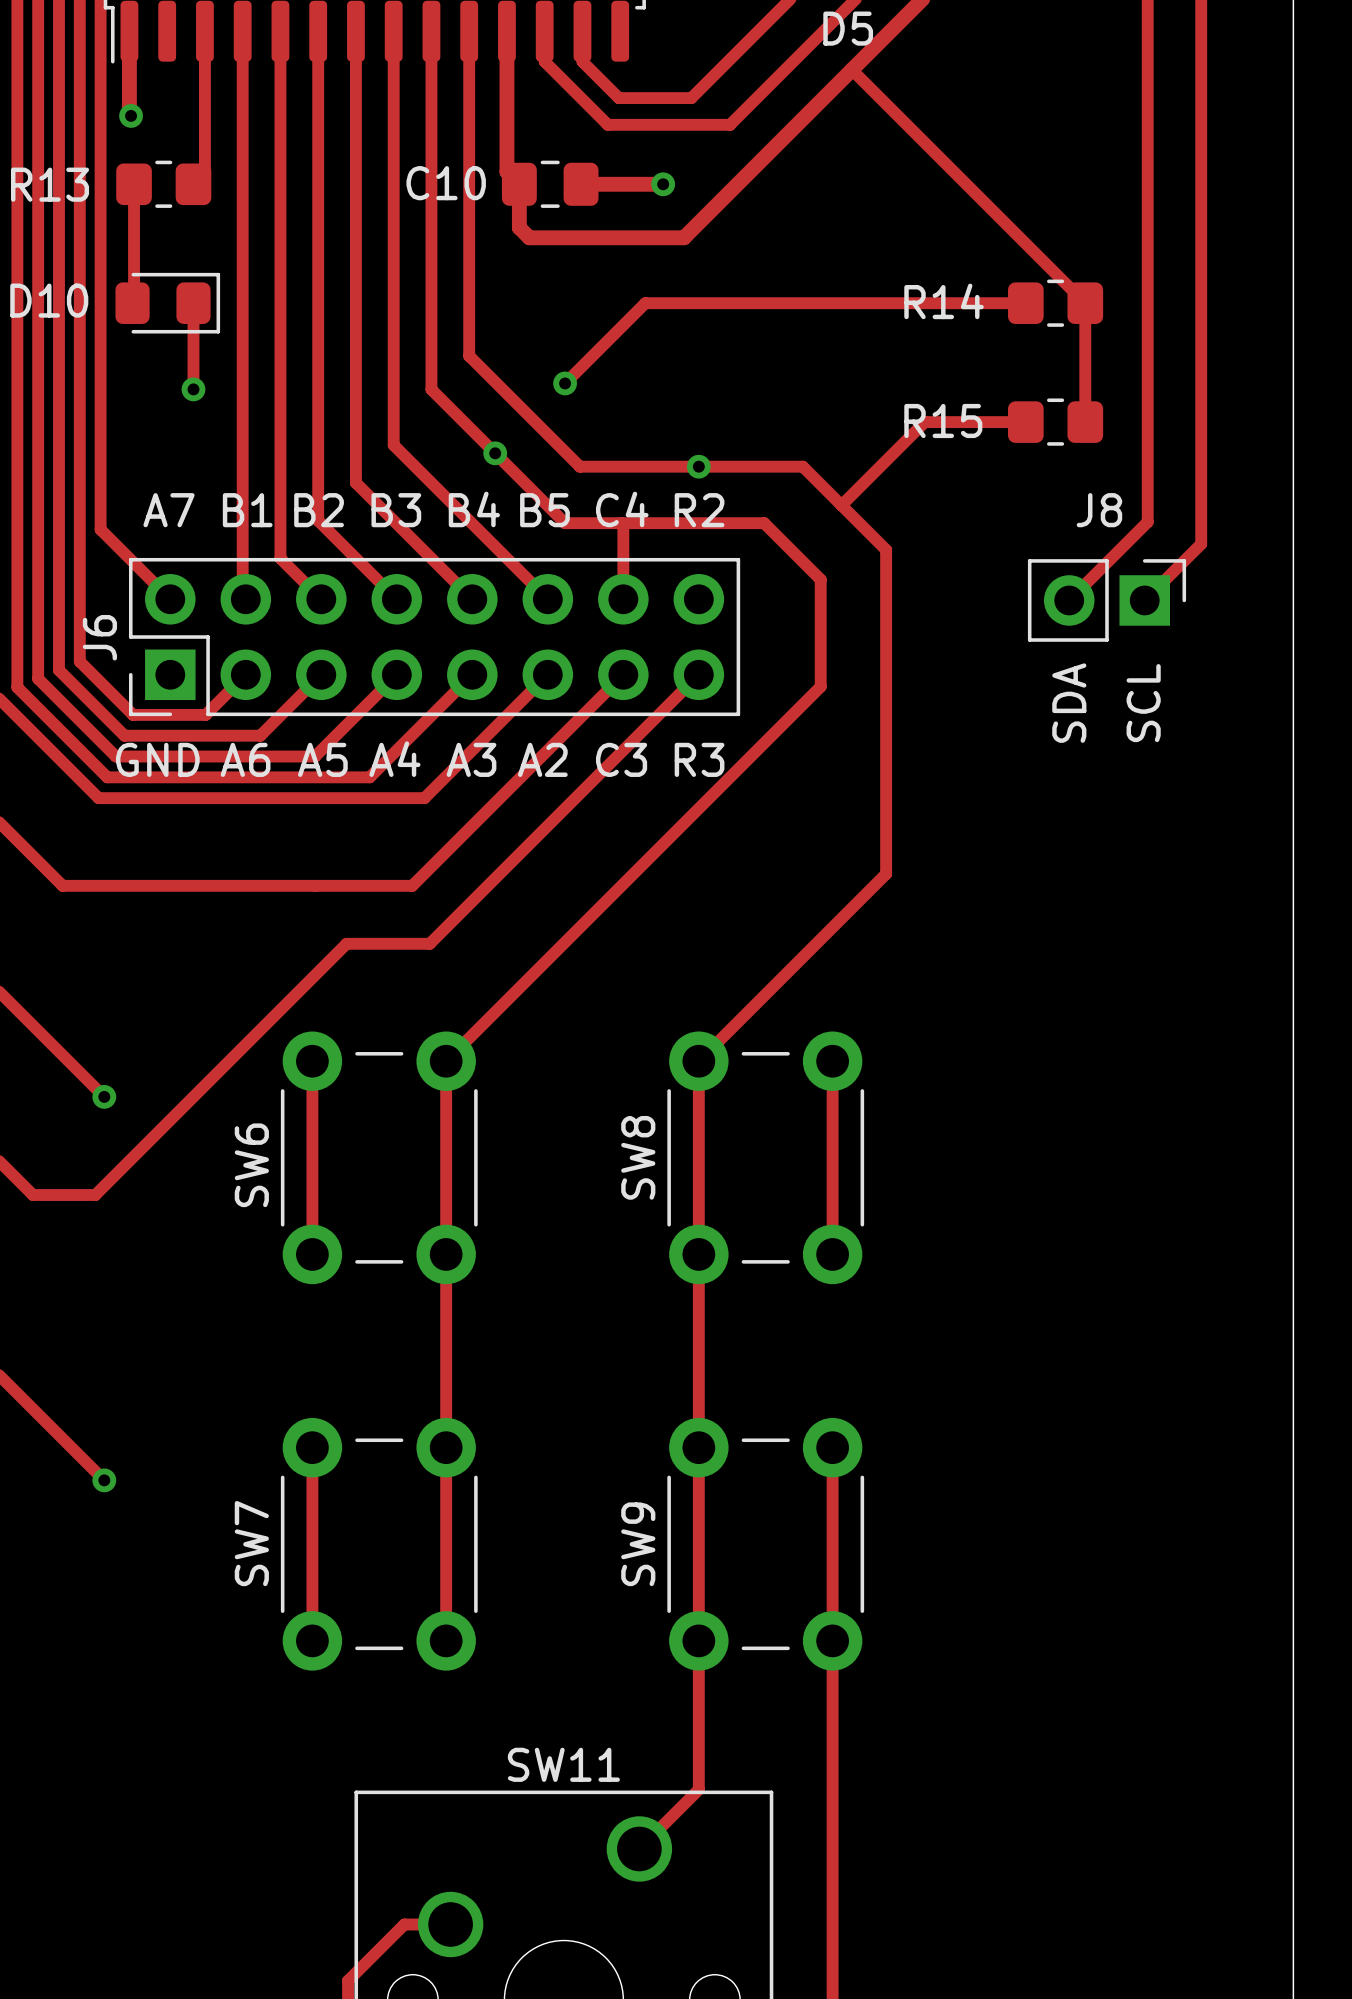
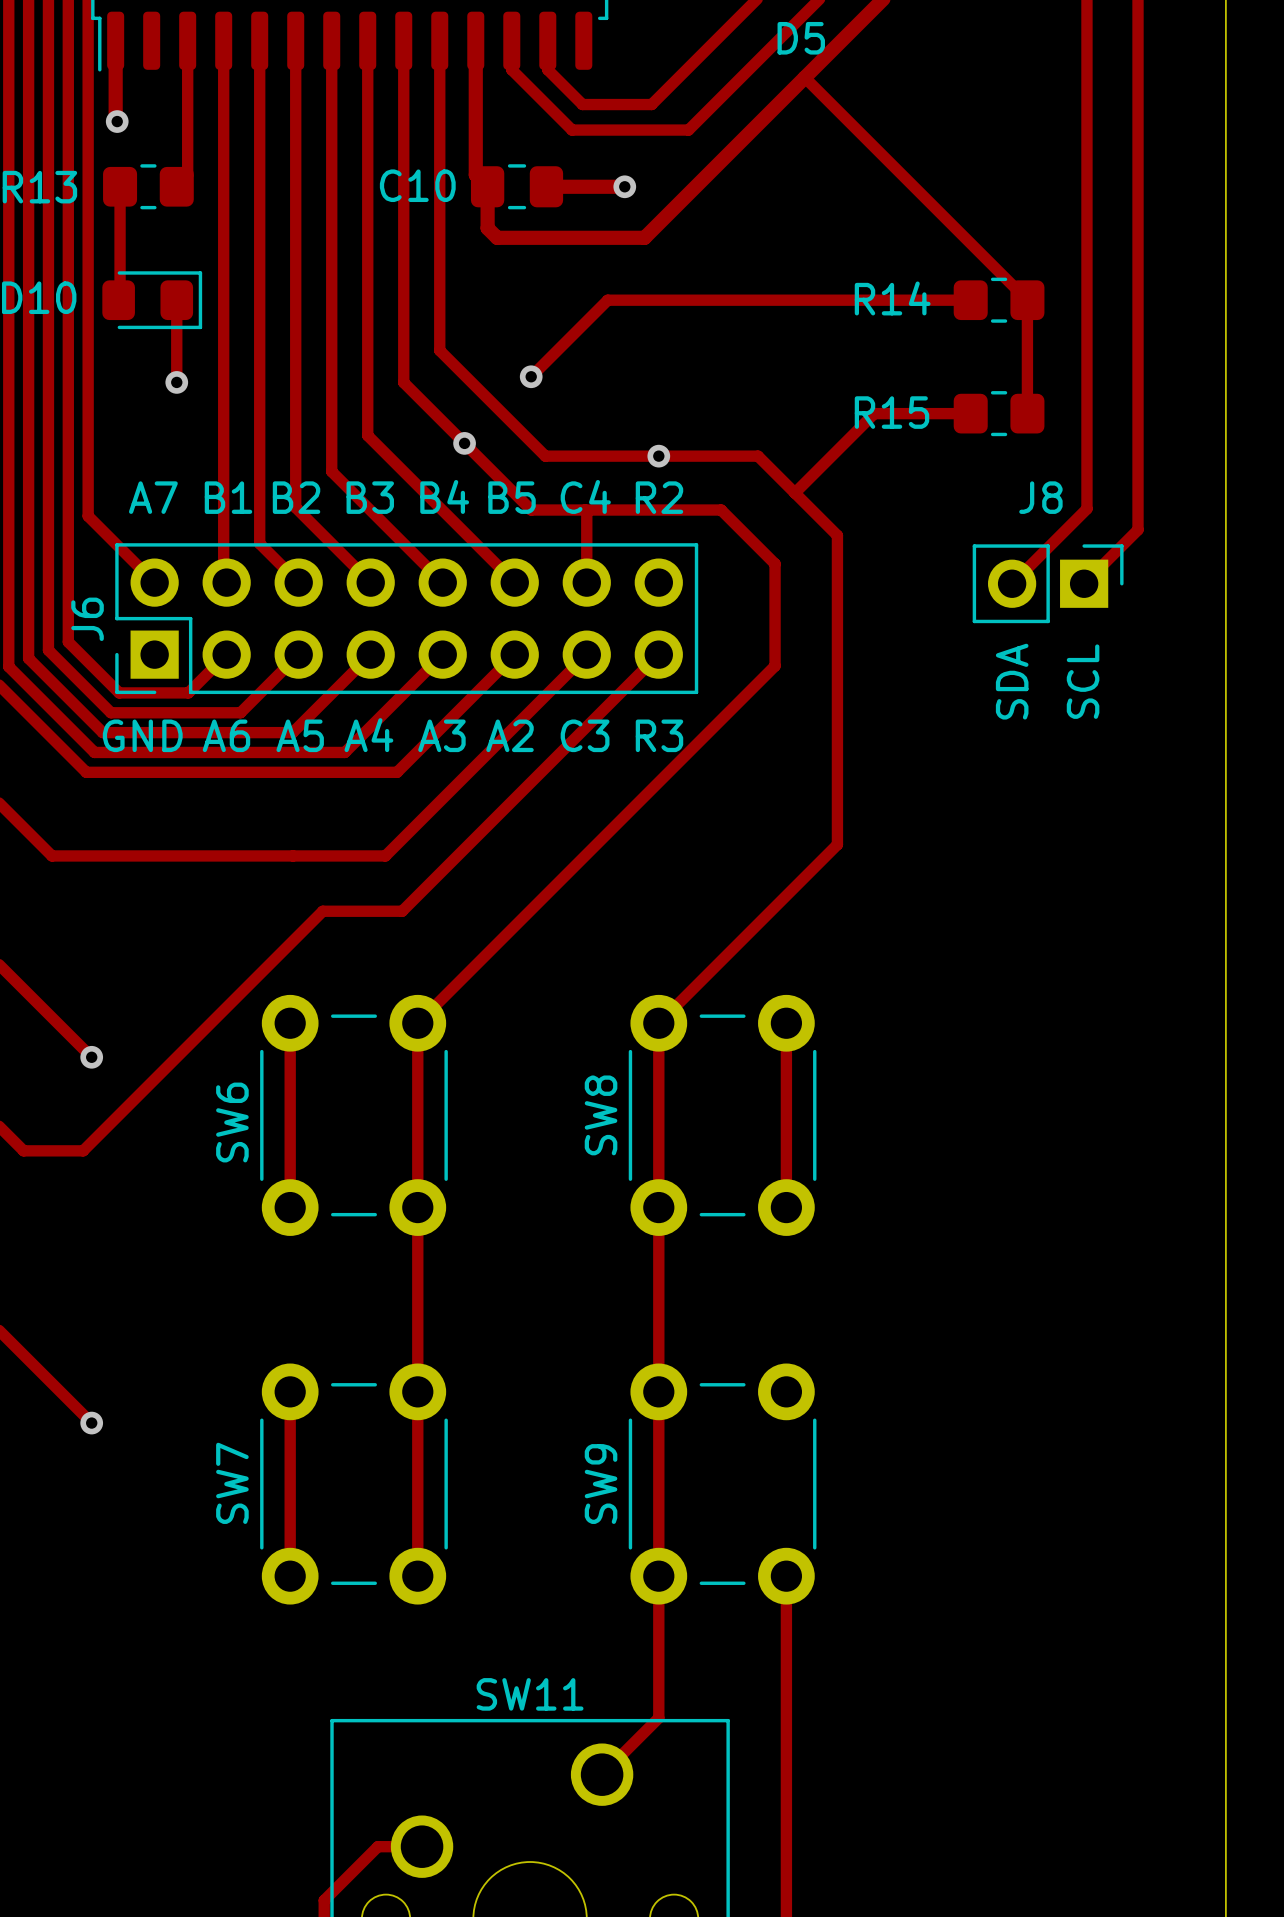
track: (832, 1447) (832, 1640) -> none

